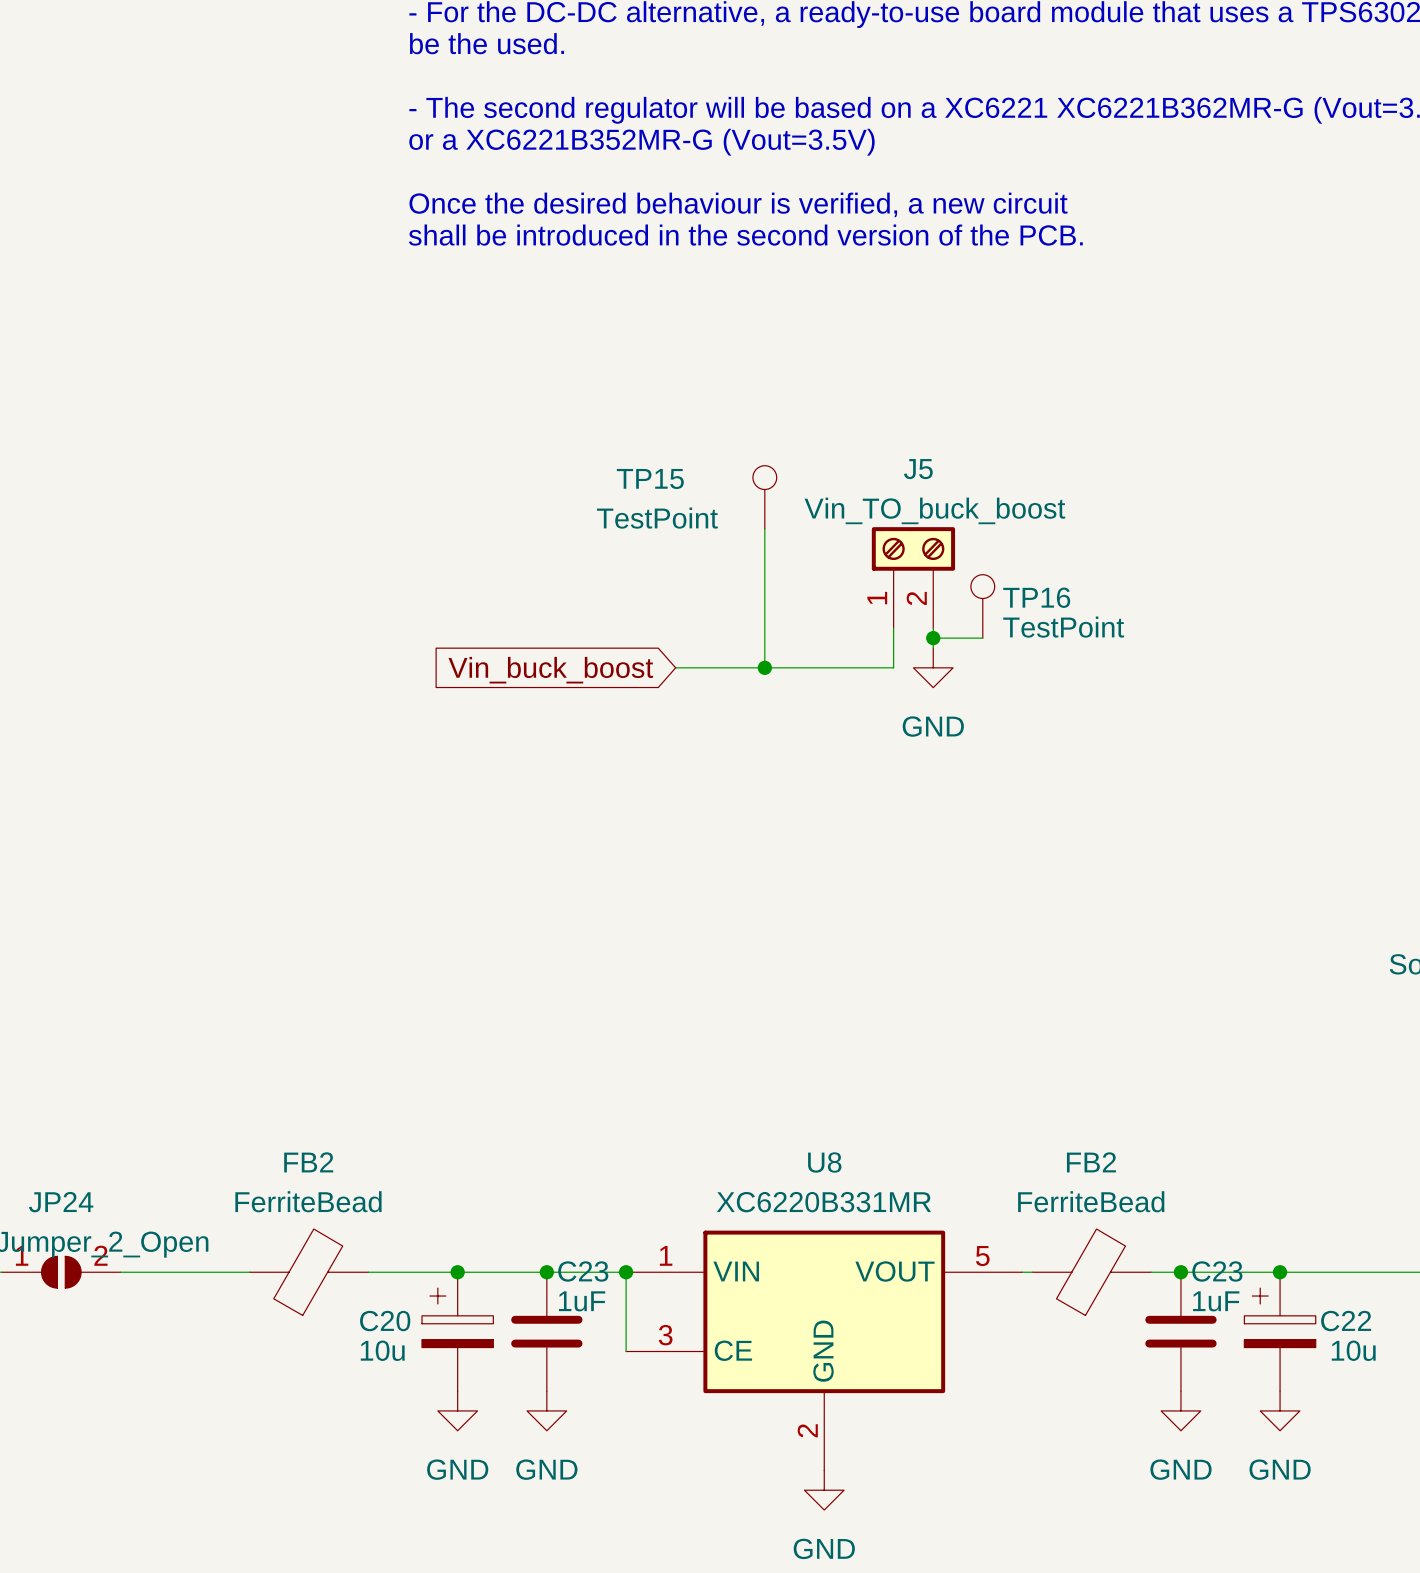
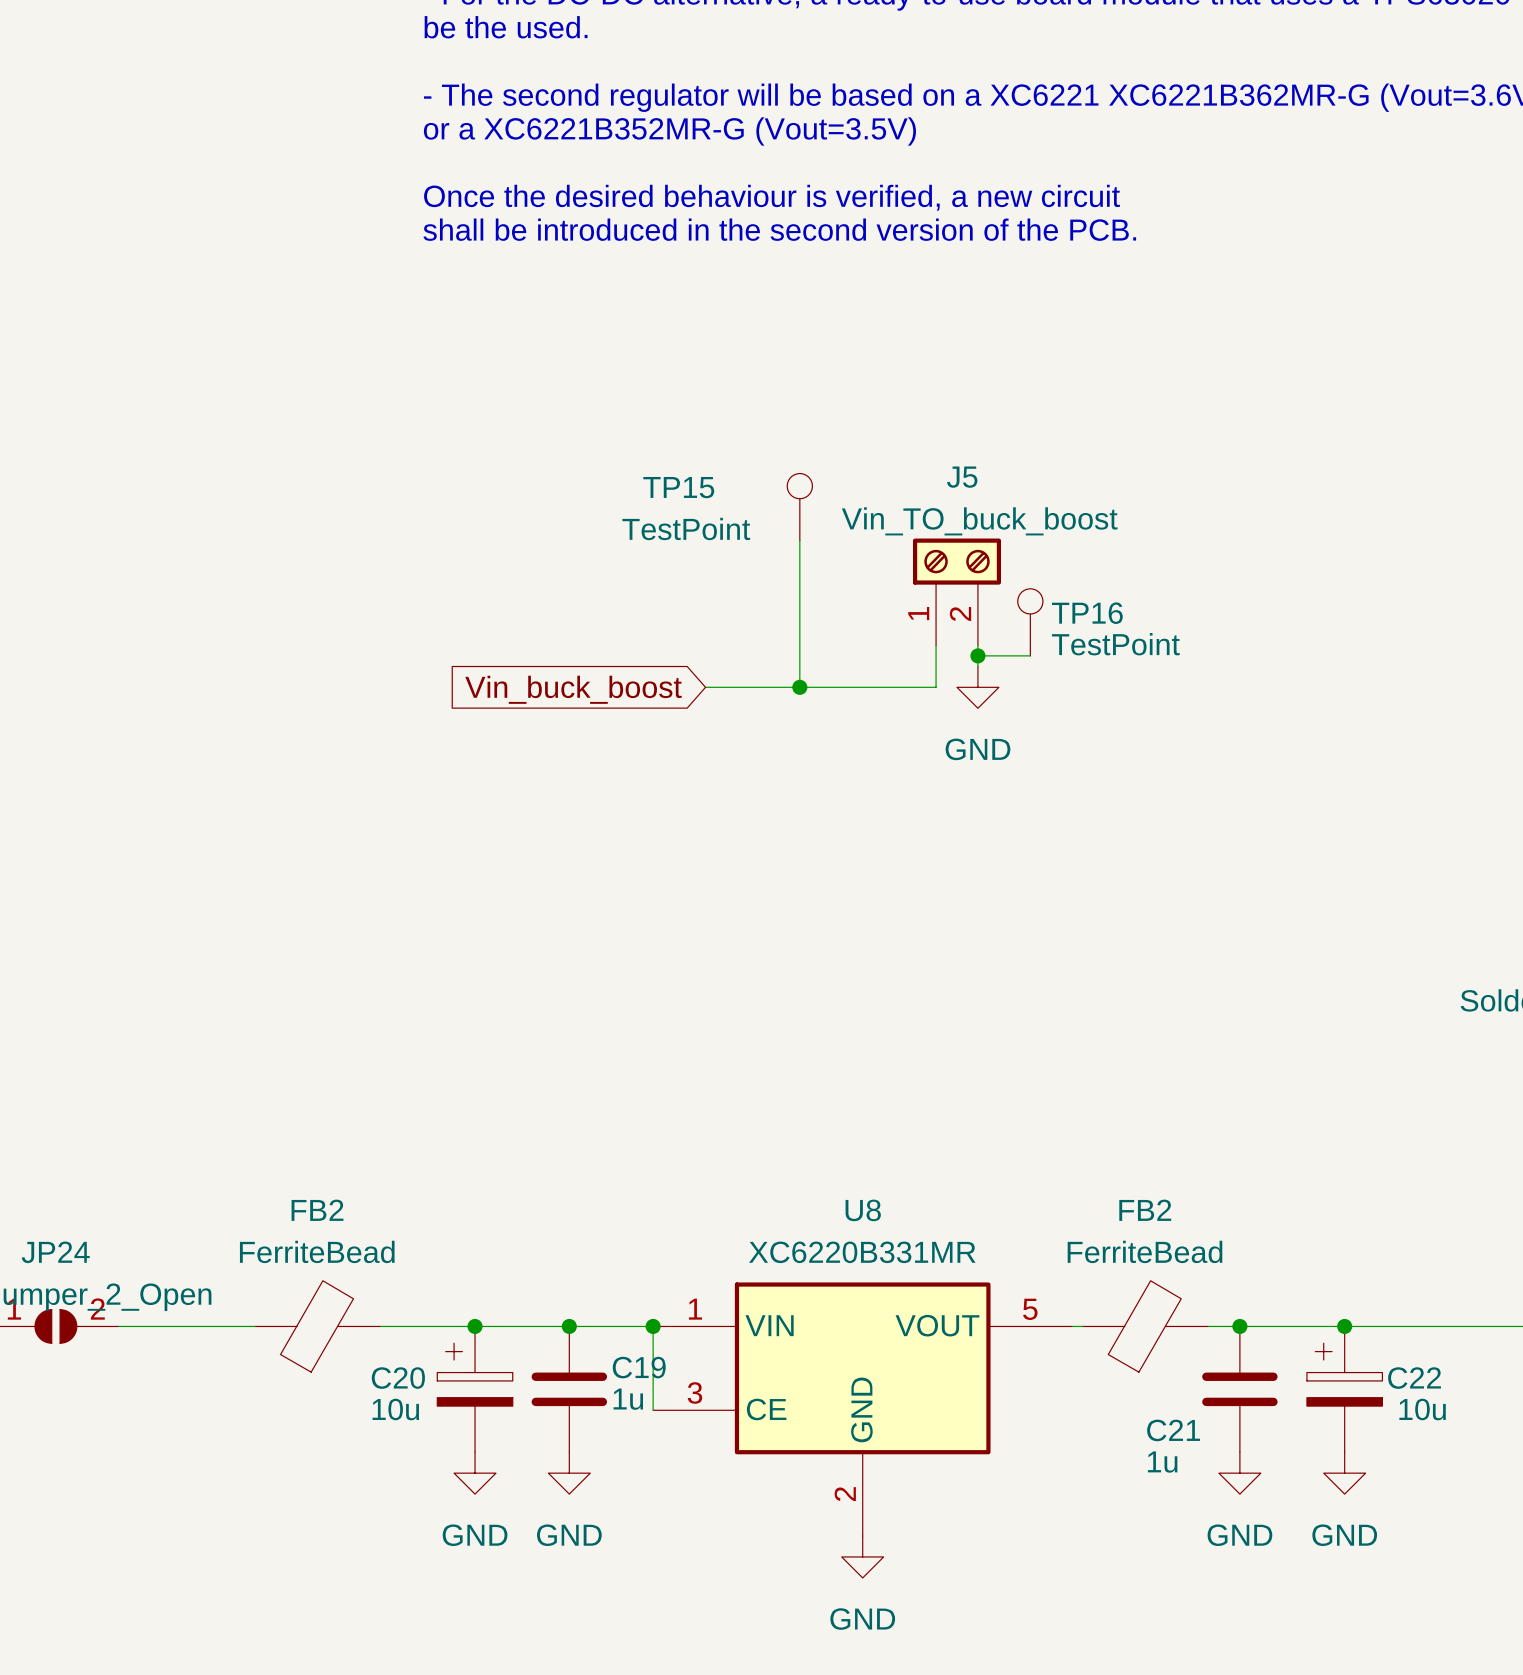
C23 name: C23 (583, 1271) -> C19 (639, 1367)
C23 name: C23 (1217, 1271) -> C21 (1173, 1430)
C23 value: 1uF (582, 1301) -> 1u (628, 1399)
C23 value: 1uF (1216, 1301) -> 1u (1162, 1462)

